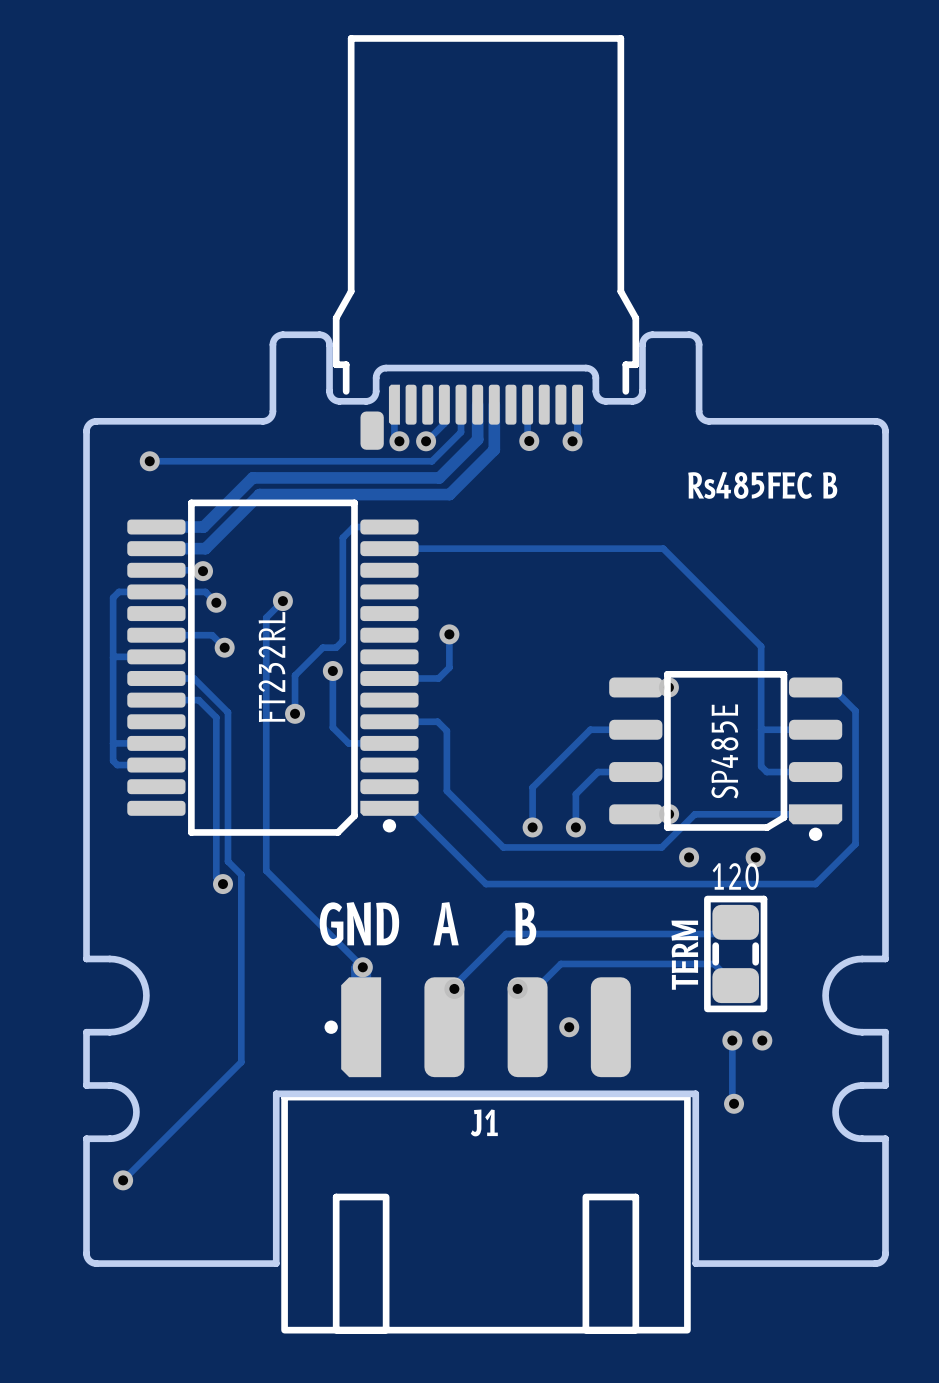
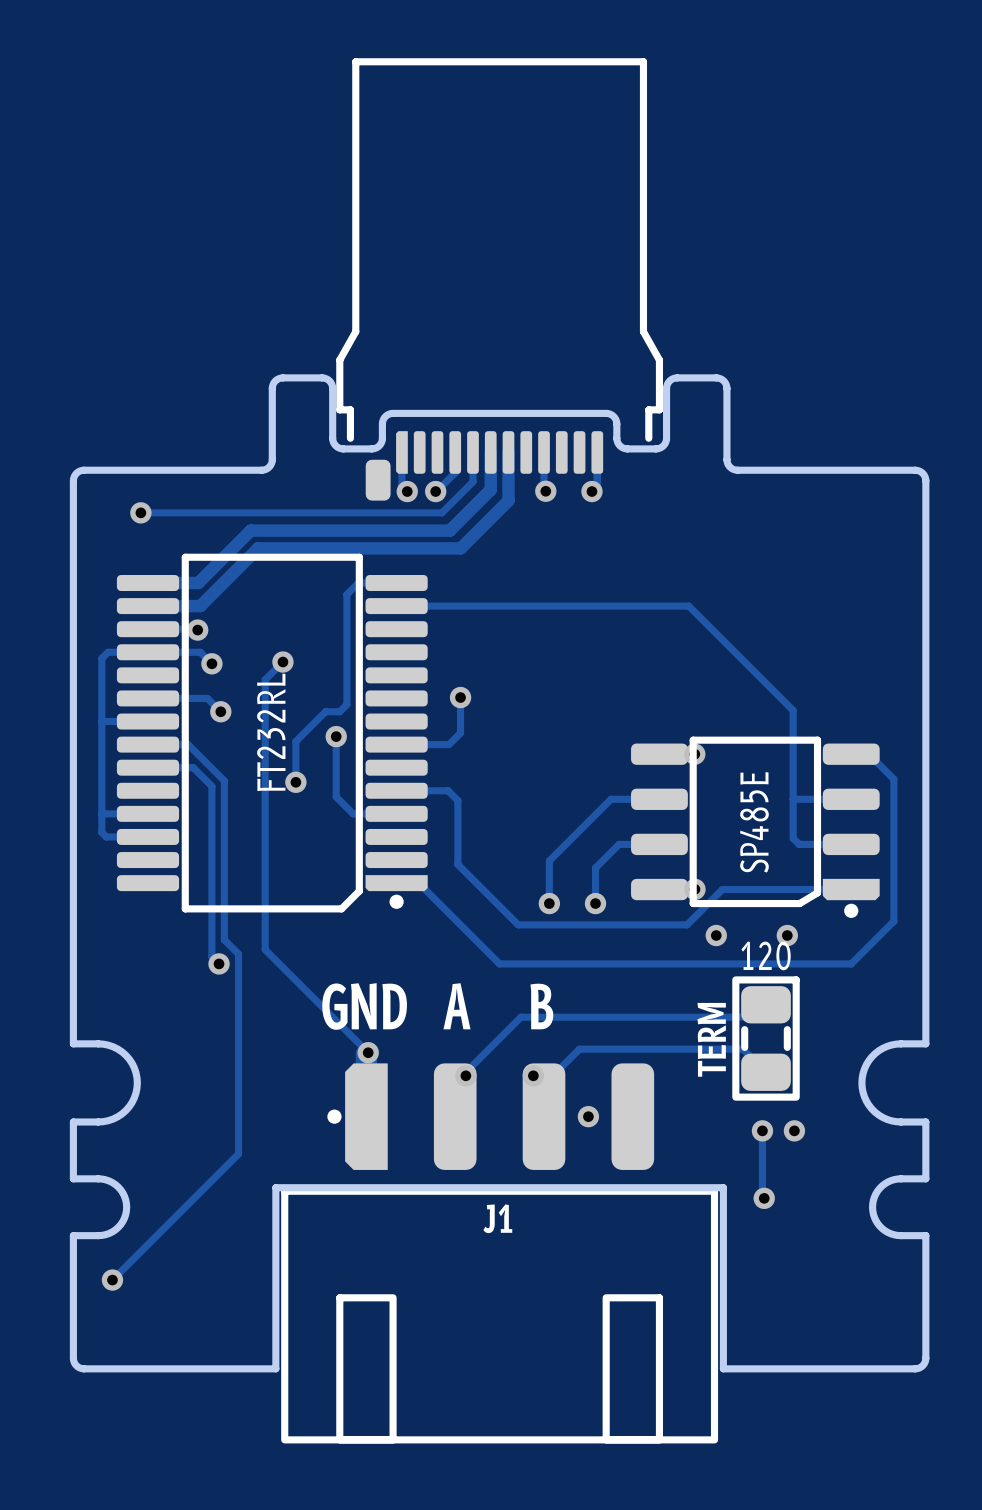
text: Rs485FEC B (762, 485) -> none

